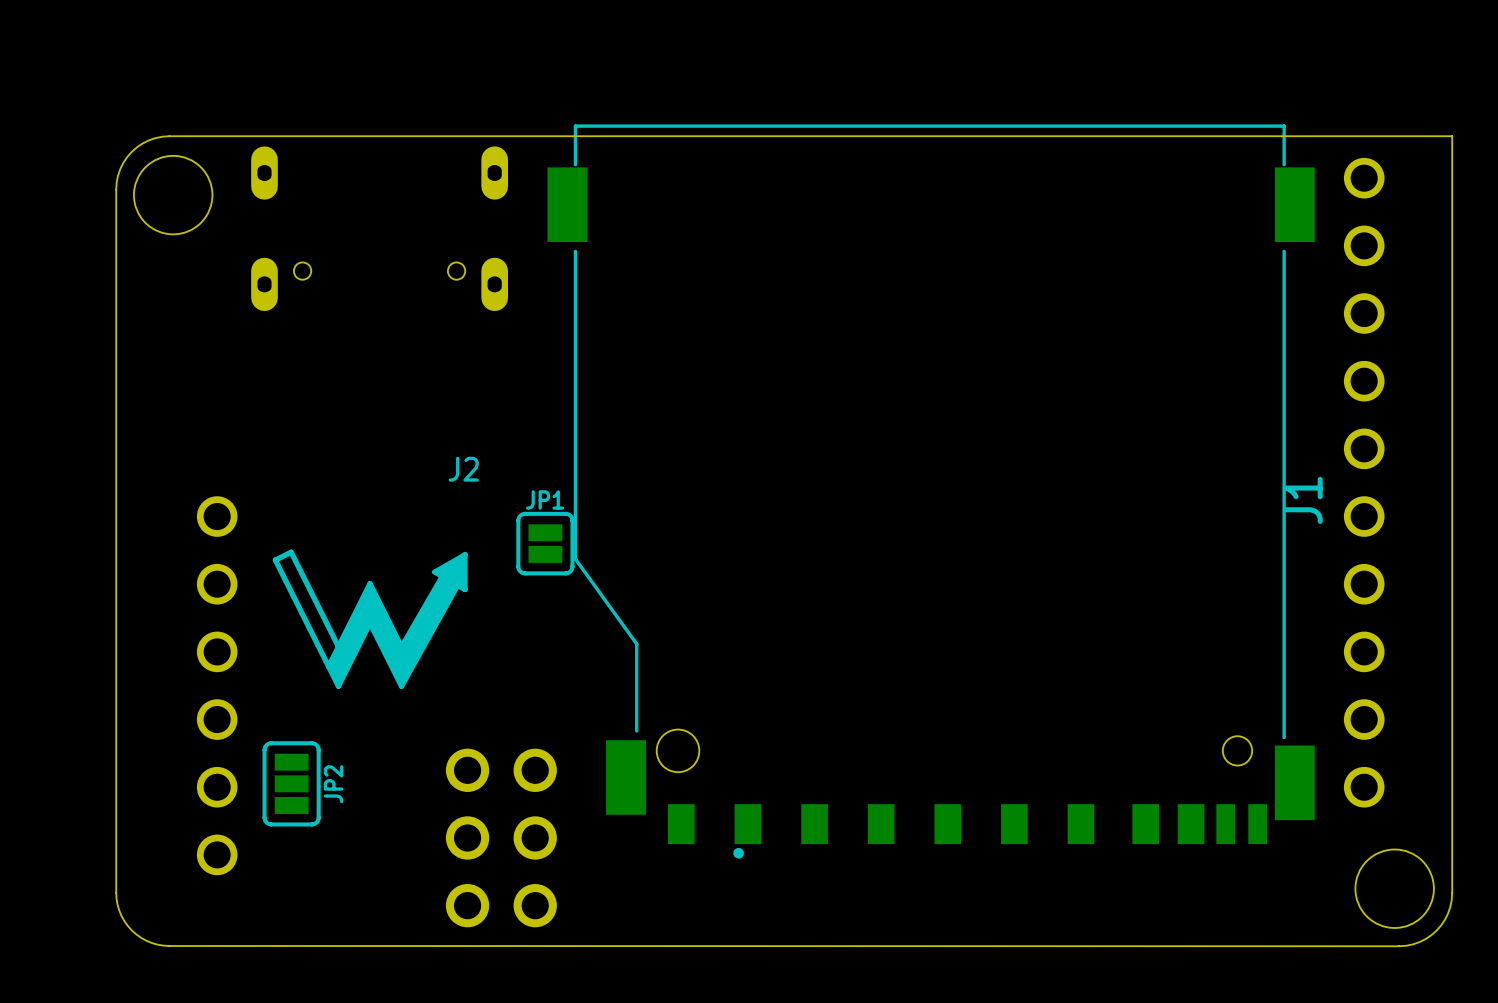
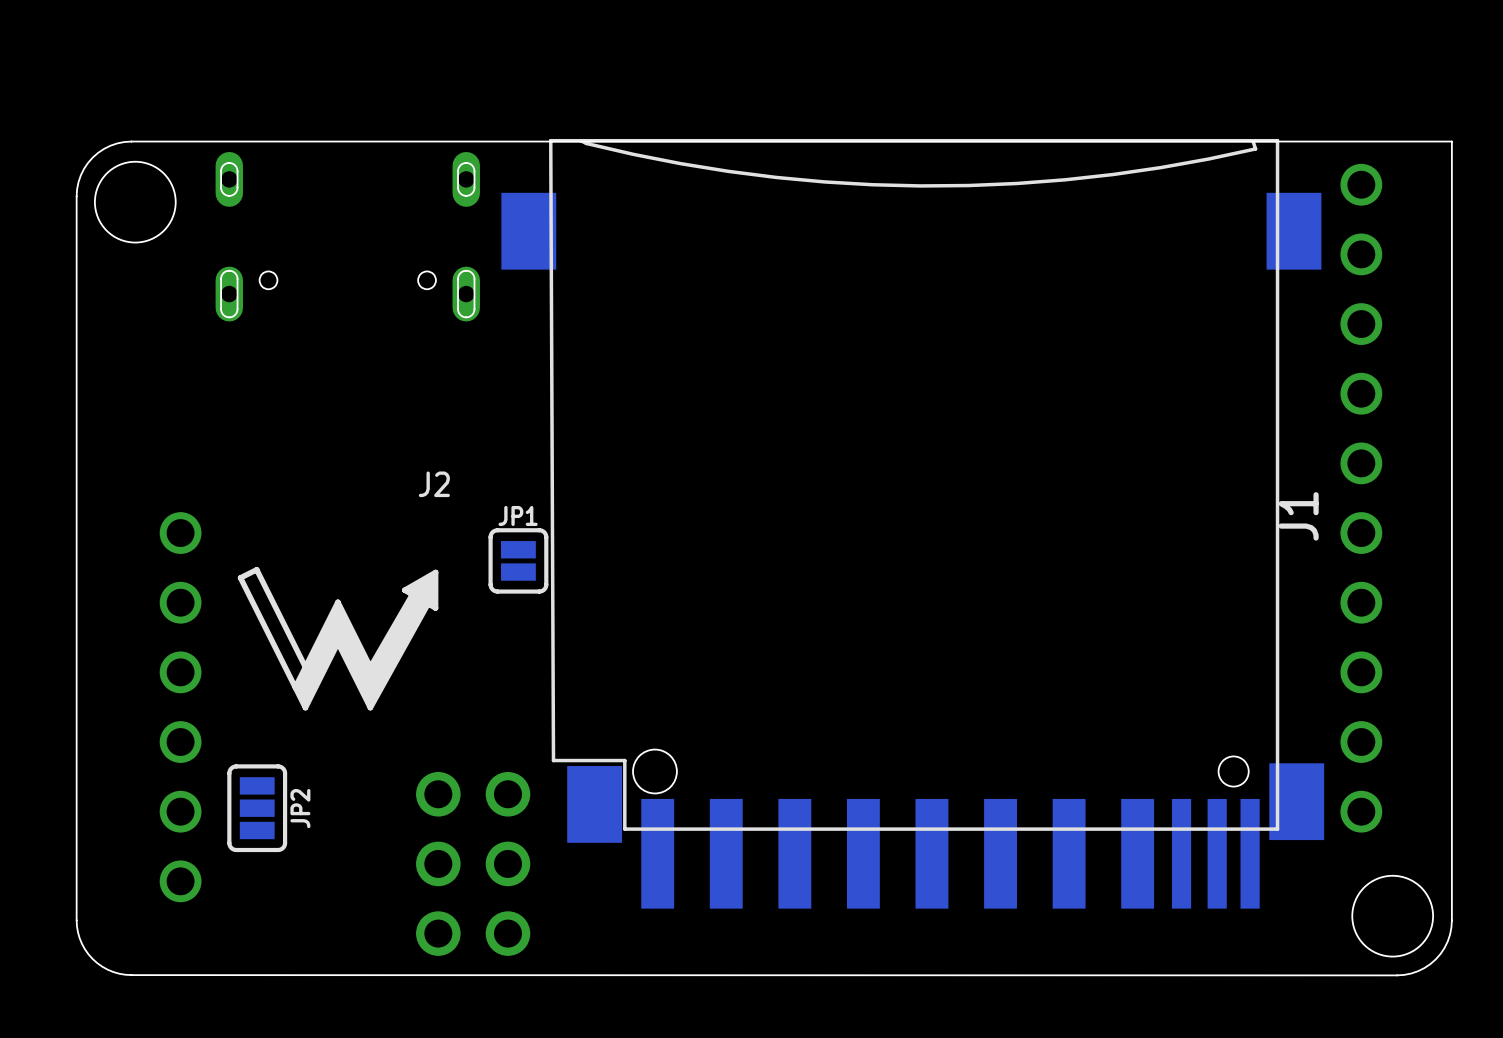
J1 footprint: [547, 124, 1315, 859] -> [501, 138, 1325, 909]

